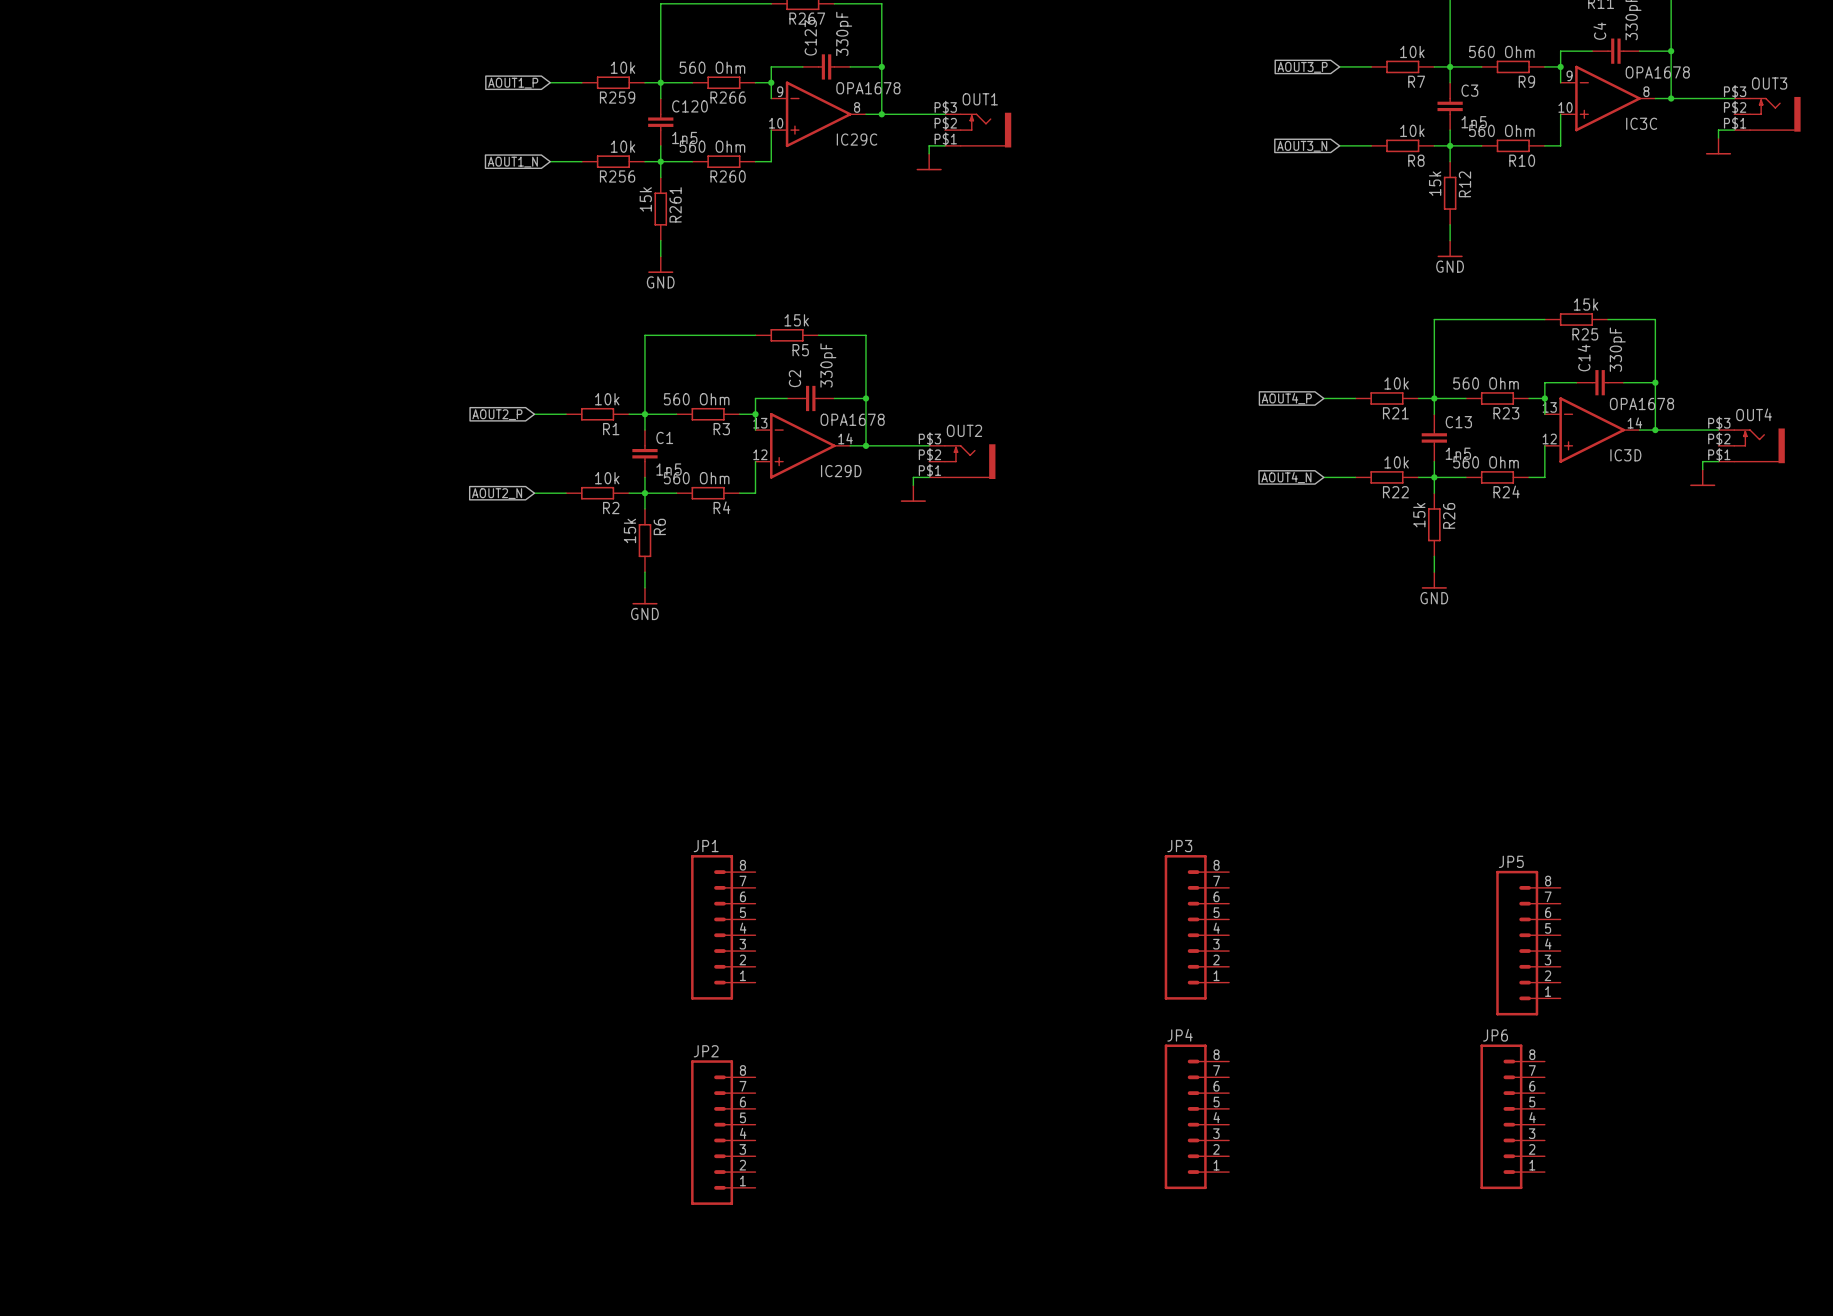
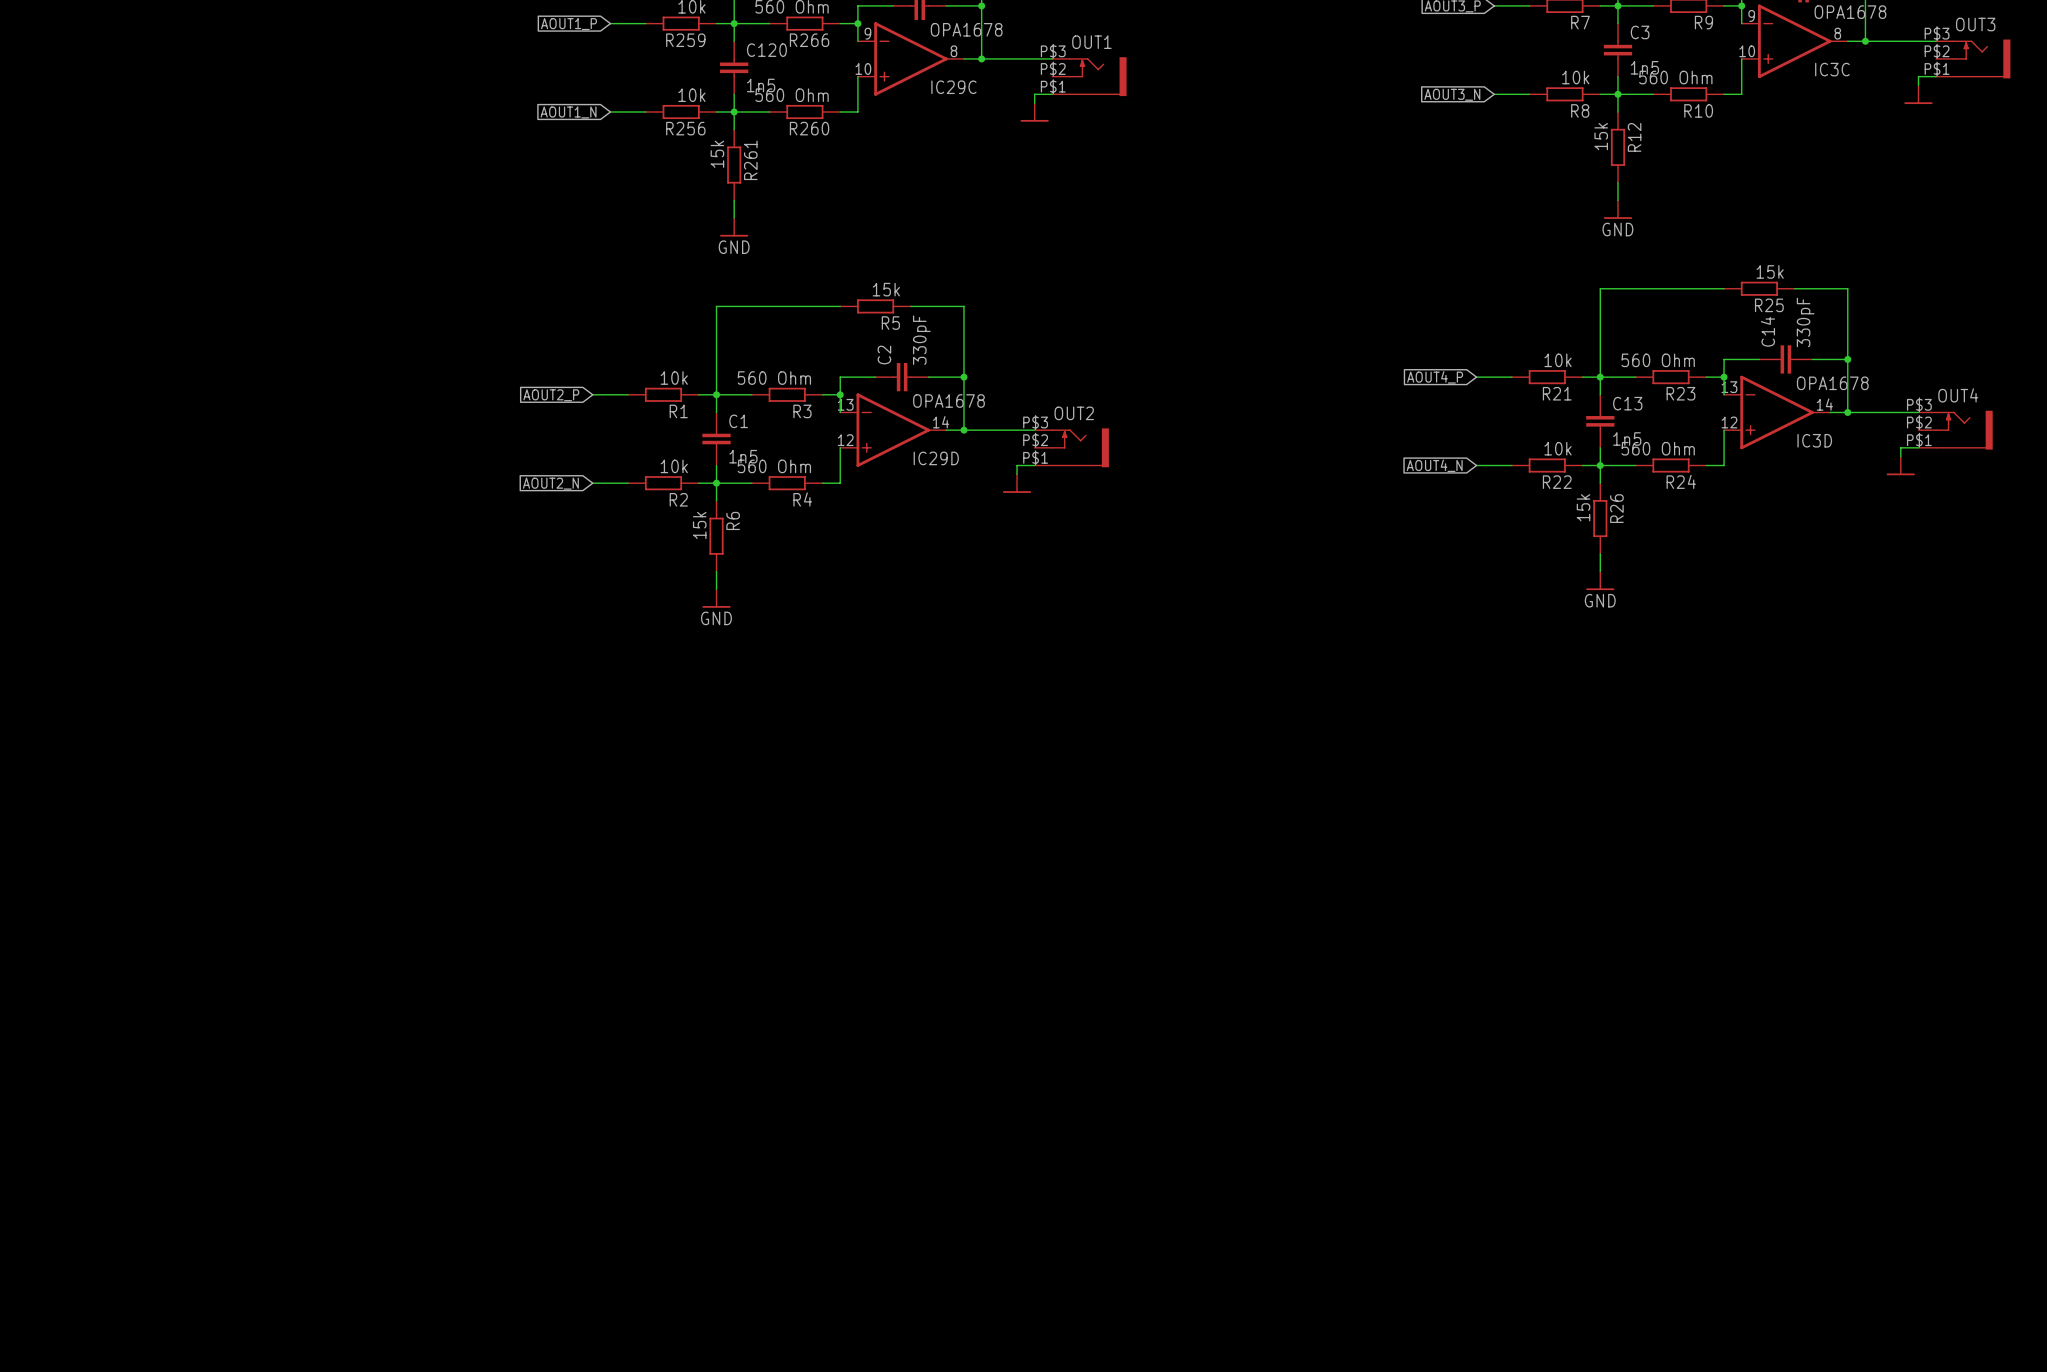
JP1: (723, 927) -> none
JP3: (1196, 927) -> none
JP5: (1528, 943) -> none
JP4: (1196, 1116) -> none
JP6: (1512, 1116) -> none
JP2: (723, 1132) -> none

